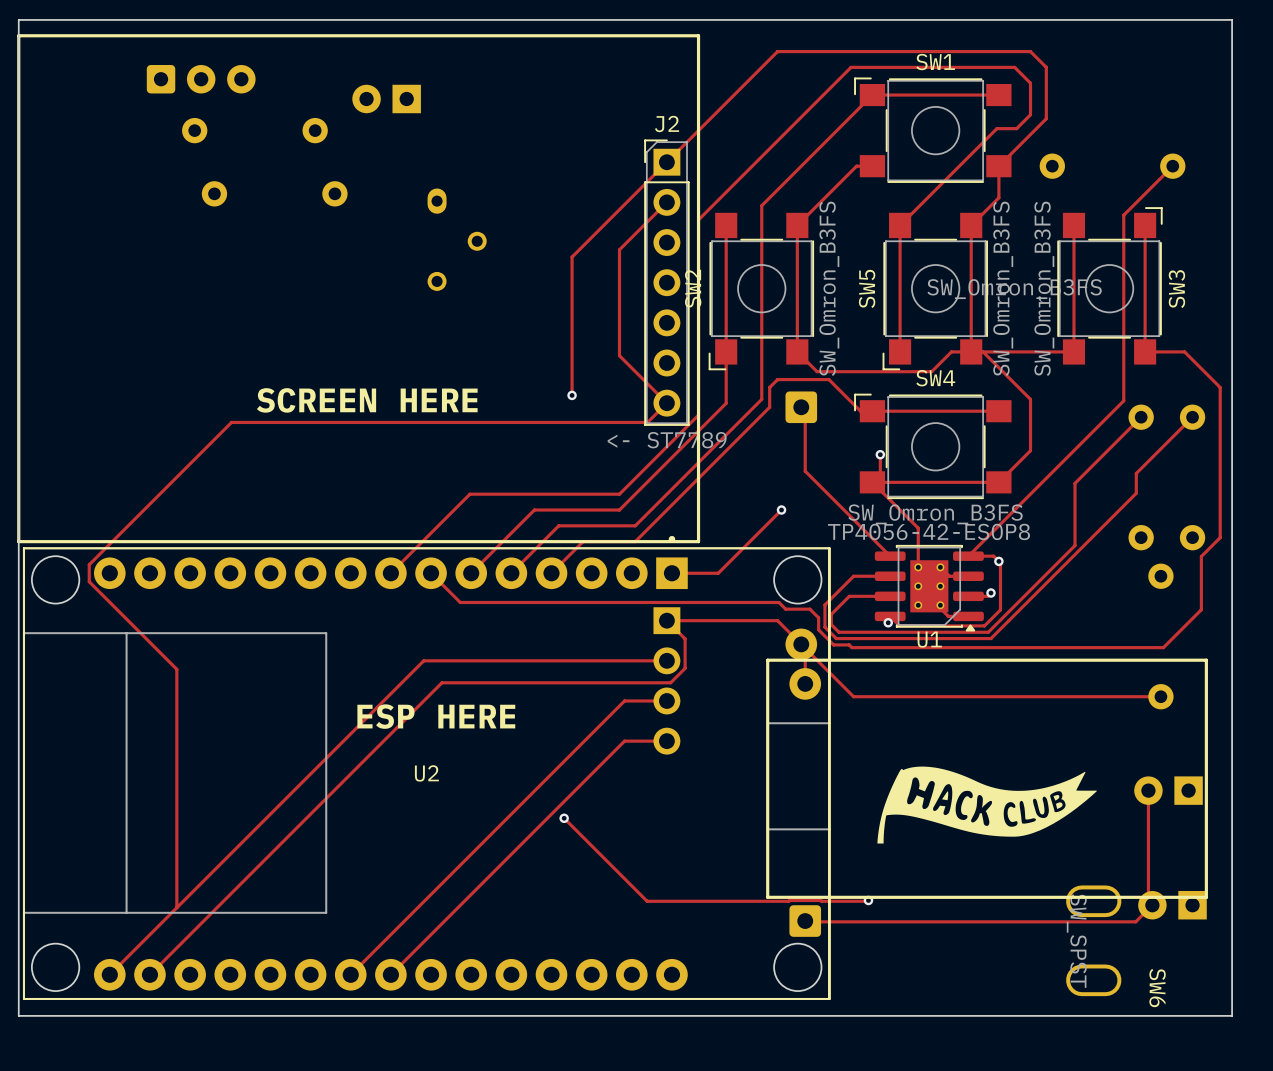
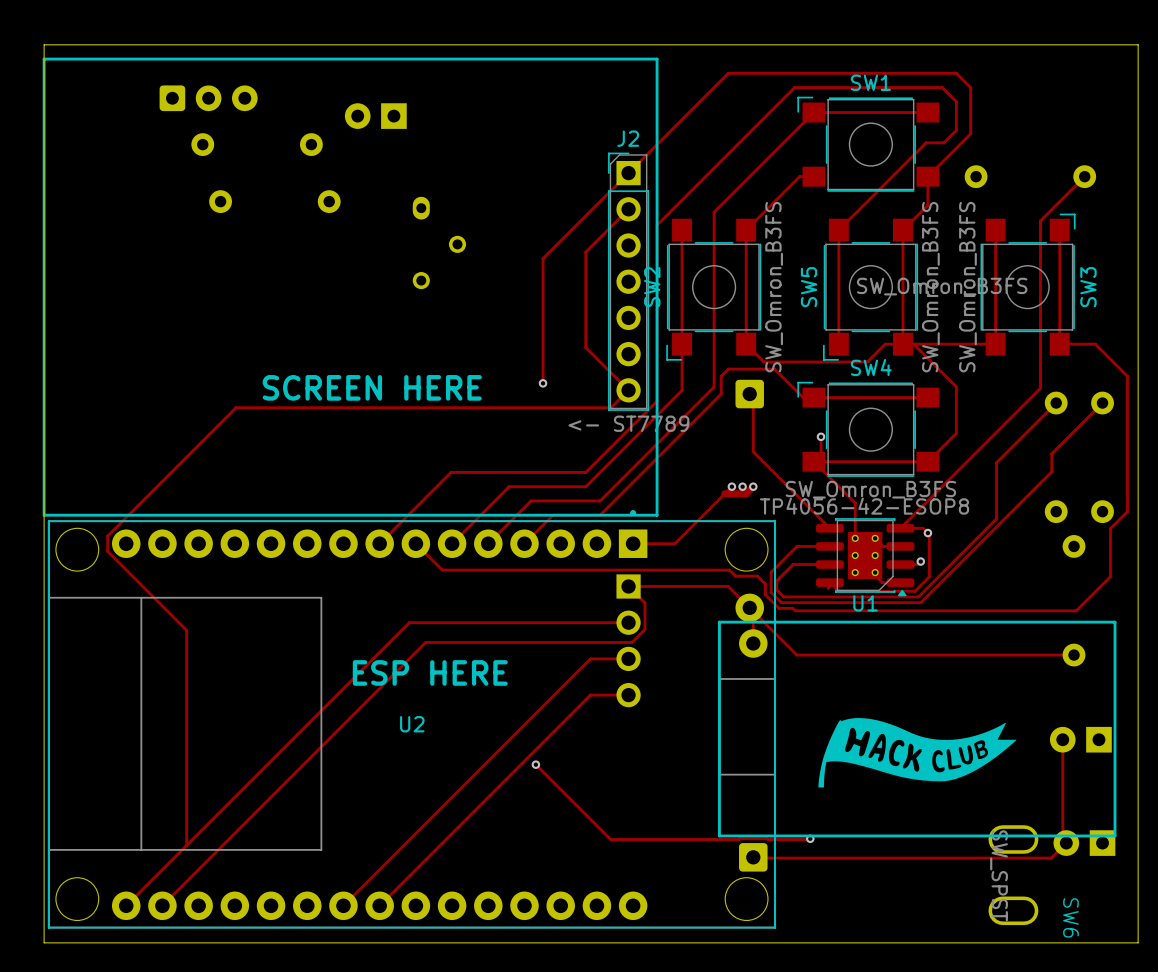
via: none -> (742, 486)
track: none -> (753, 486) (746, 493) (724, 493)
via: none -> (753, 486)
via: (888, 622) -> none

